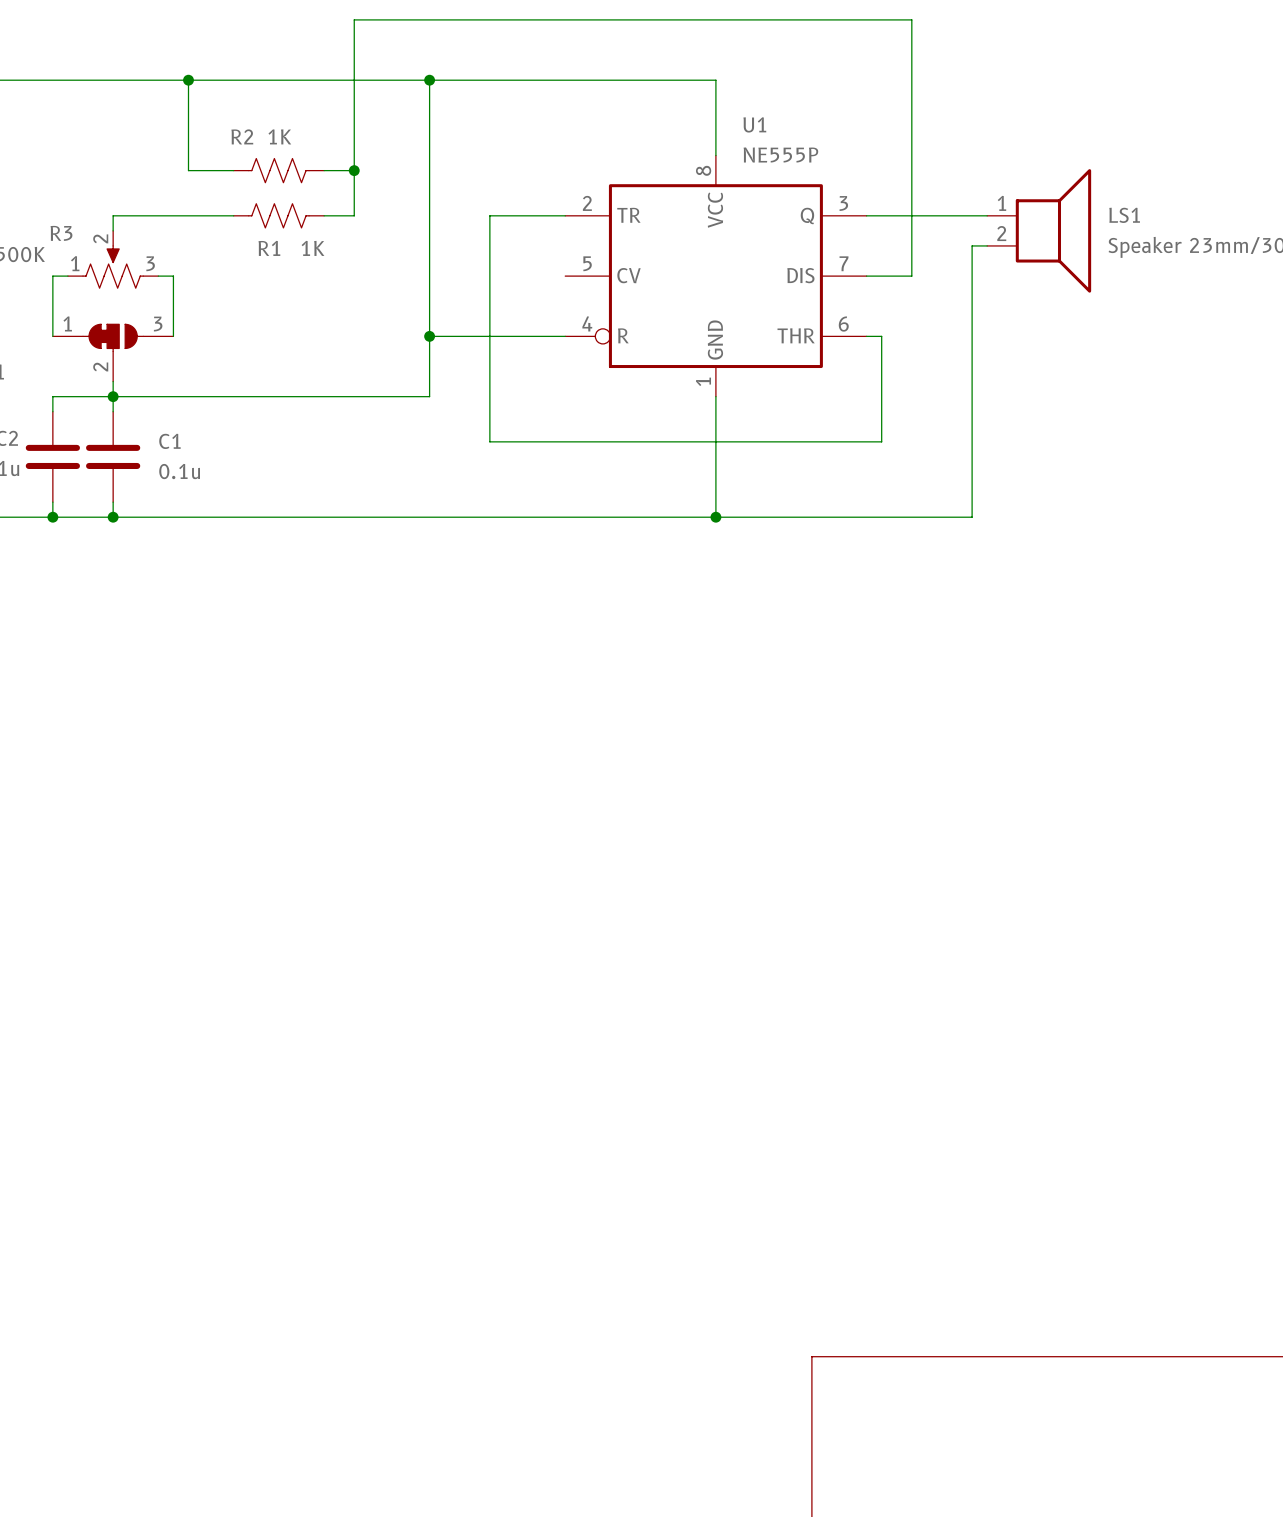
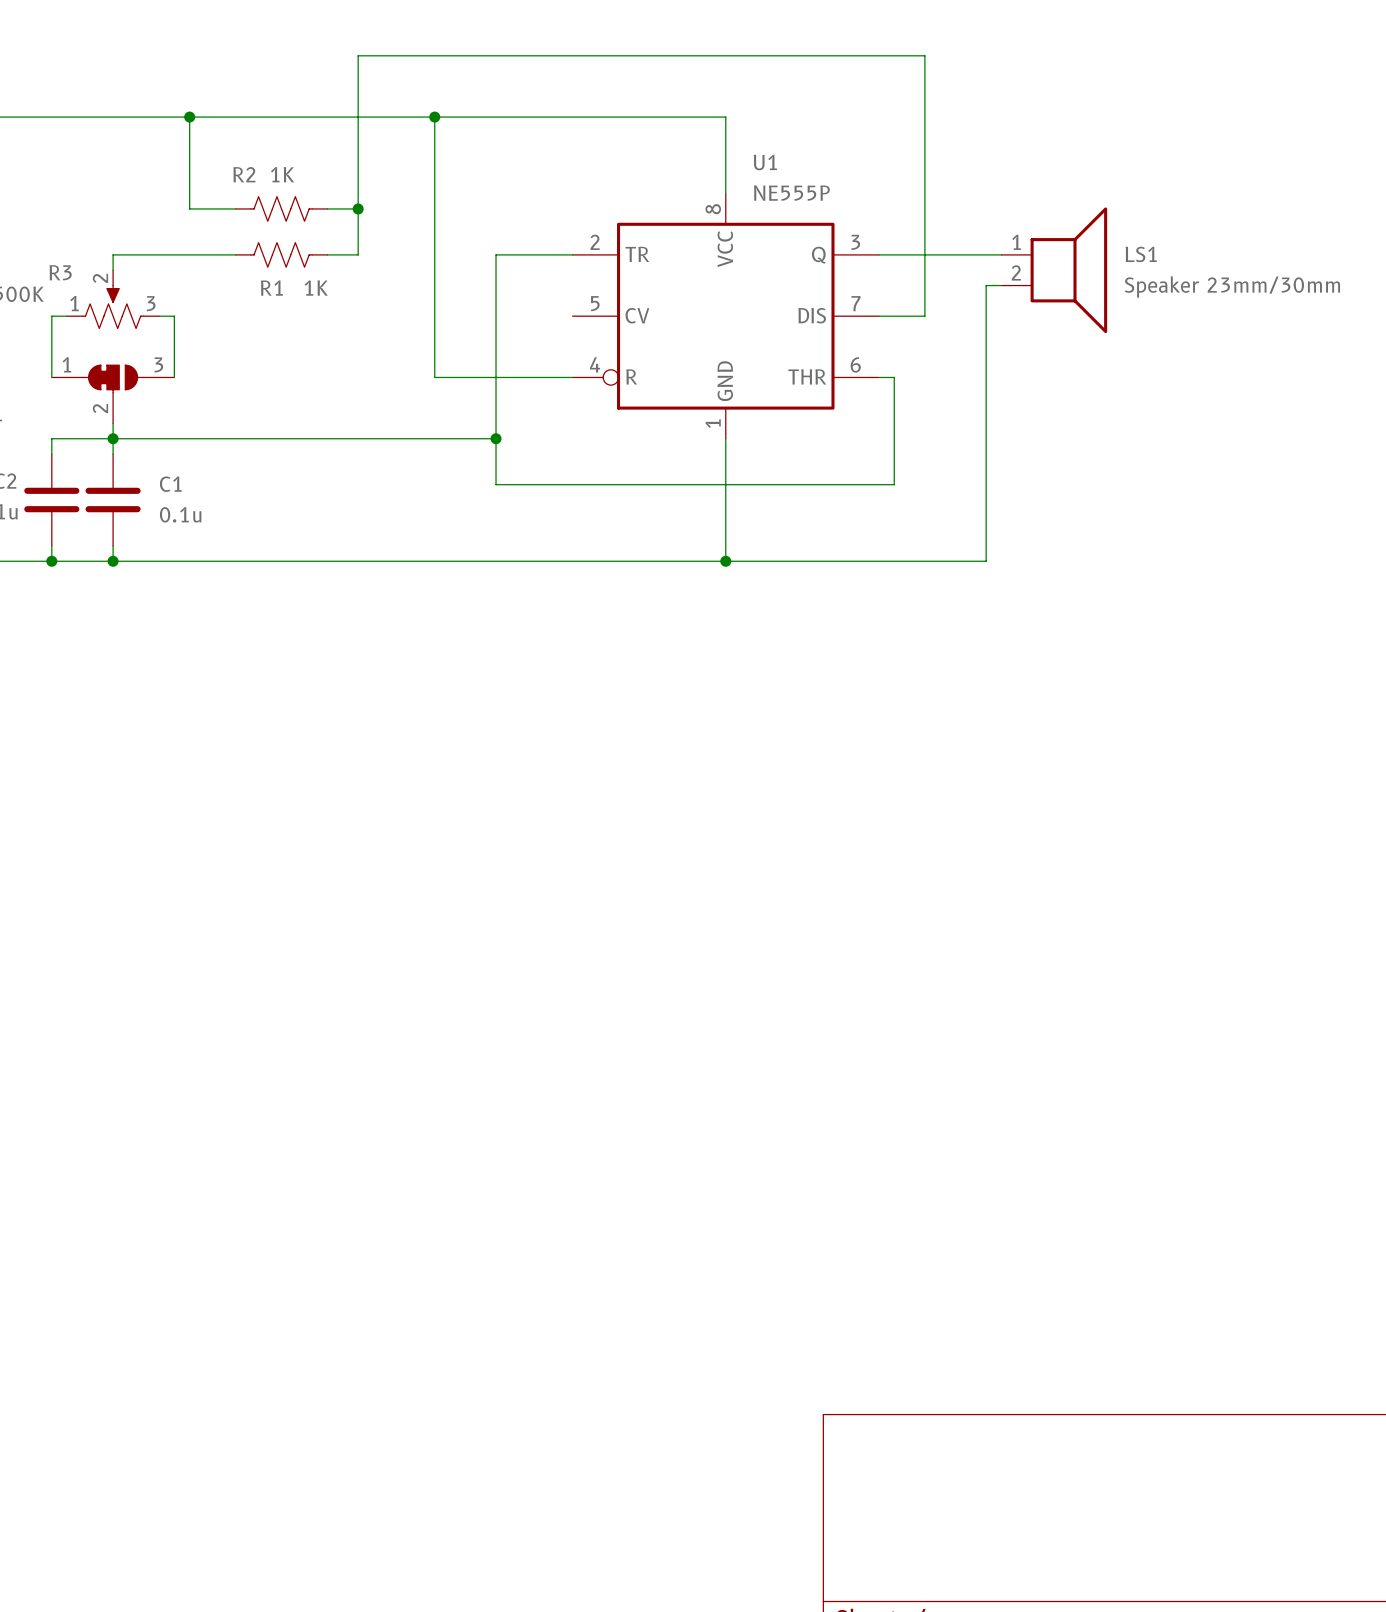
wire: (429, 336) (429, 396) -> (496, 438) (434, 438)
junction: (429, 336) -> none
junction: none -> (496, 438)

